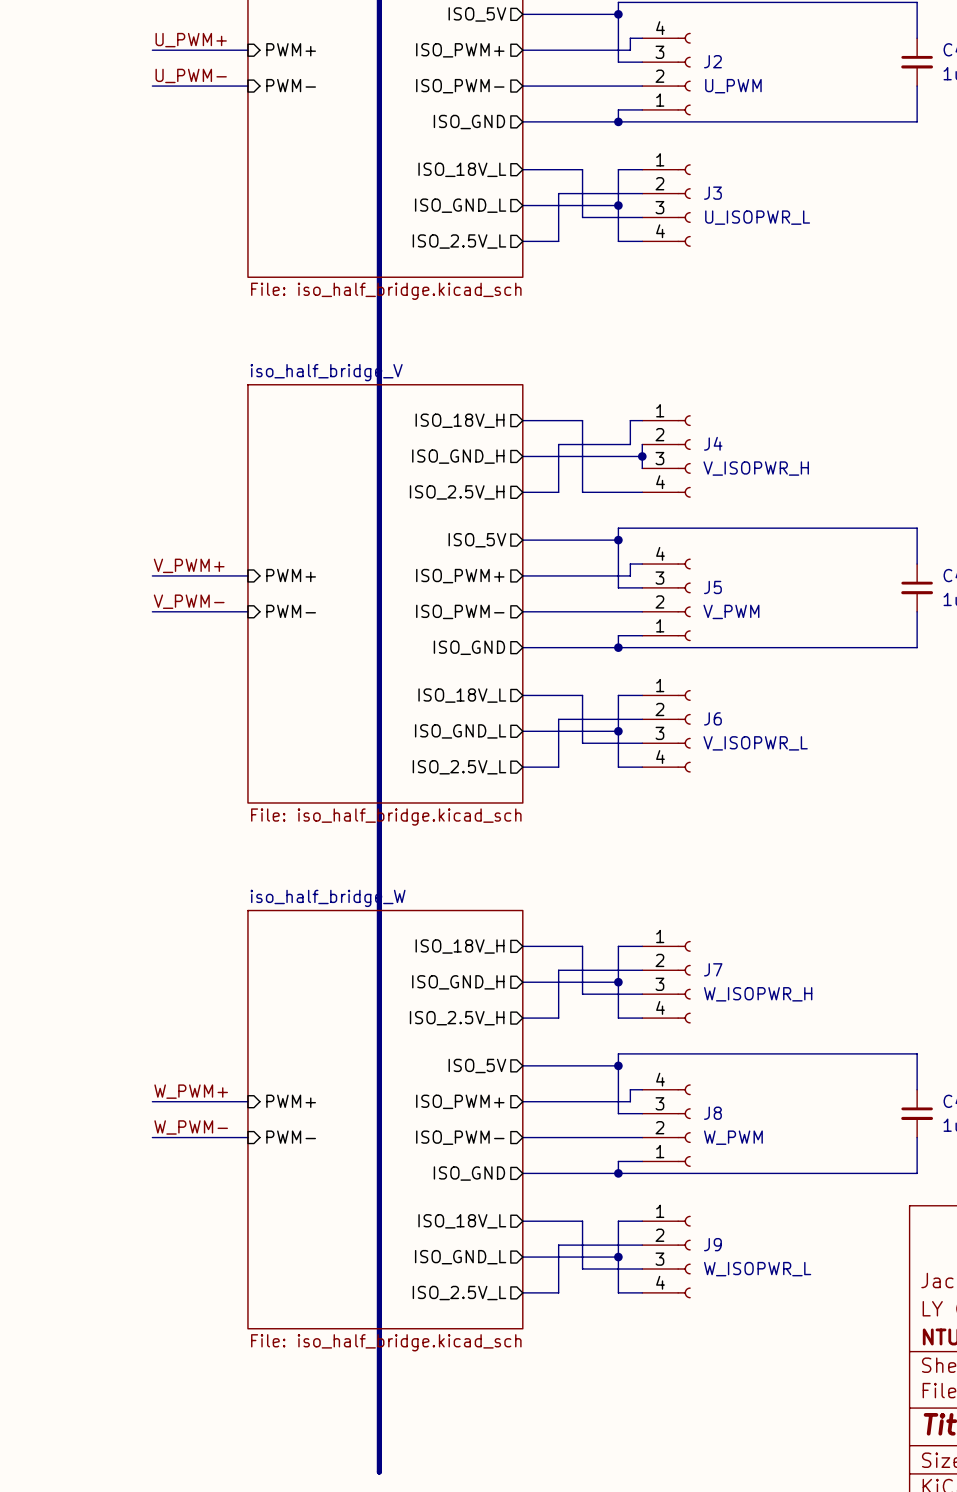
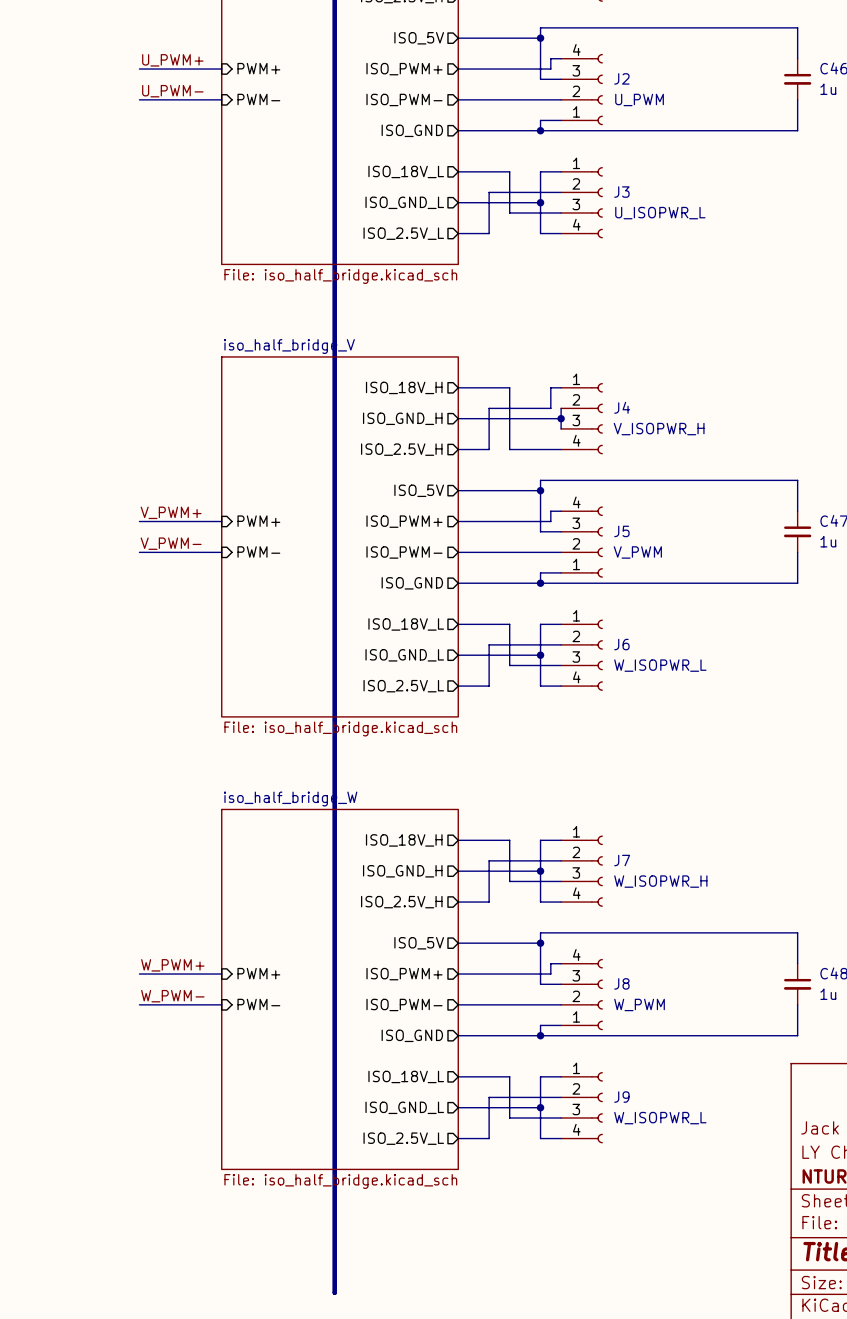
J6 value: V_ISOPWR_L (755, 743) -> W_ISOPWR_L (660, 665)

